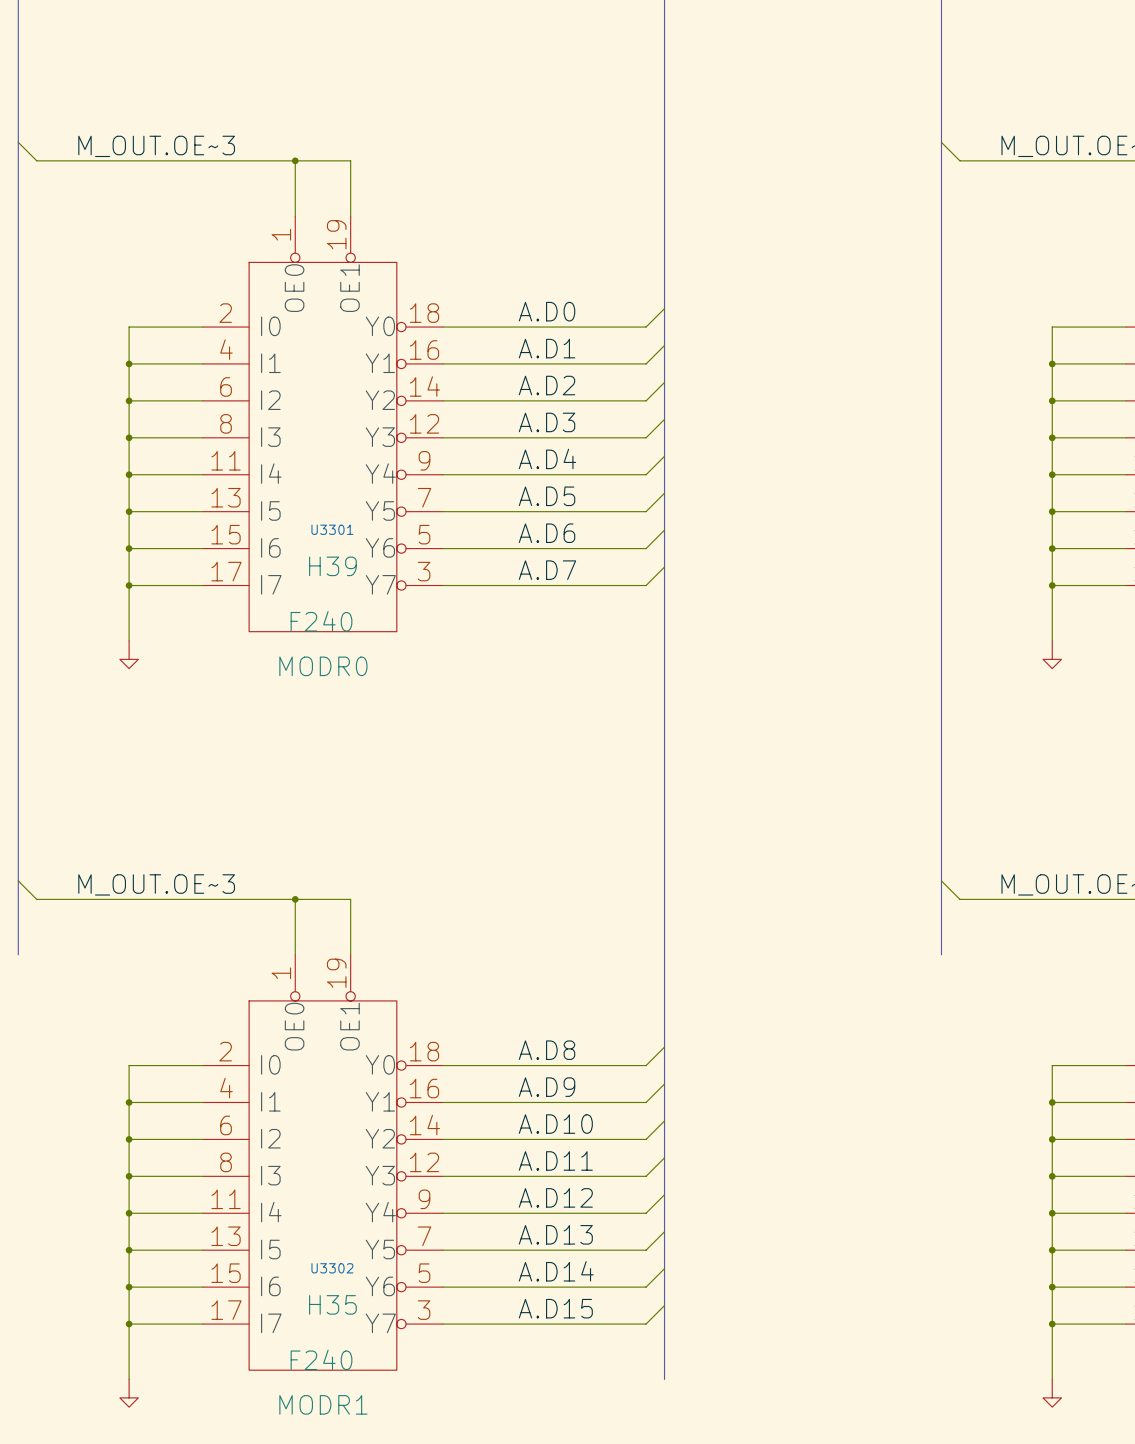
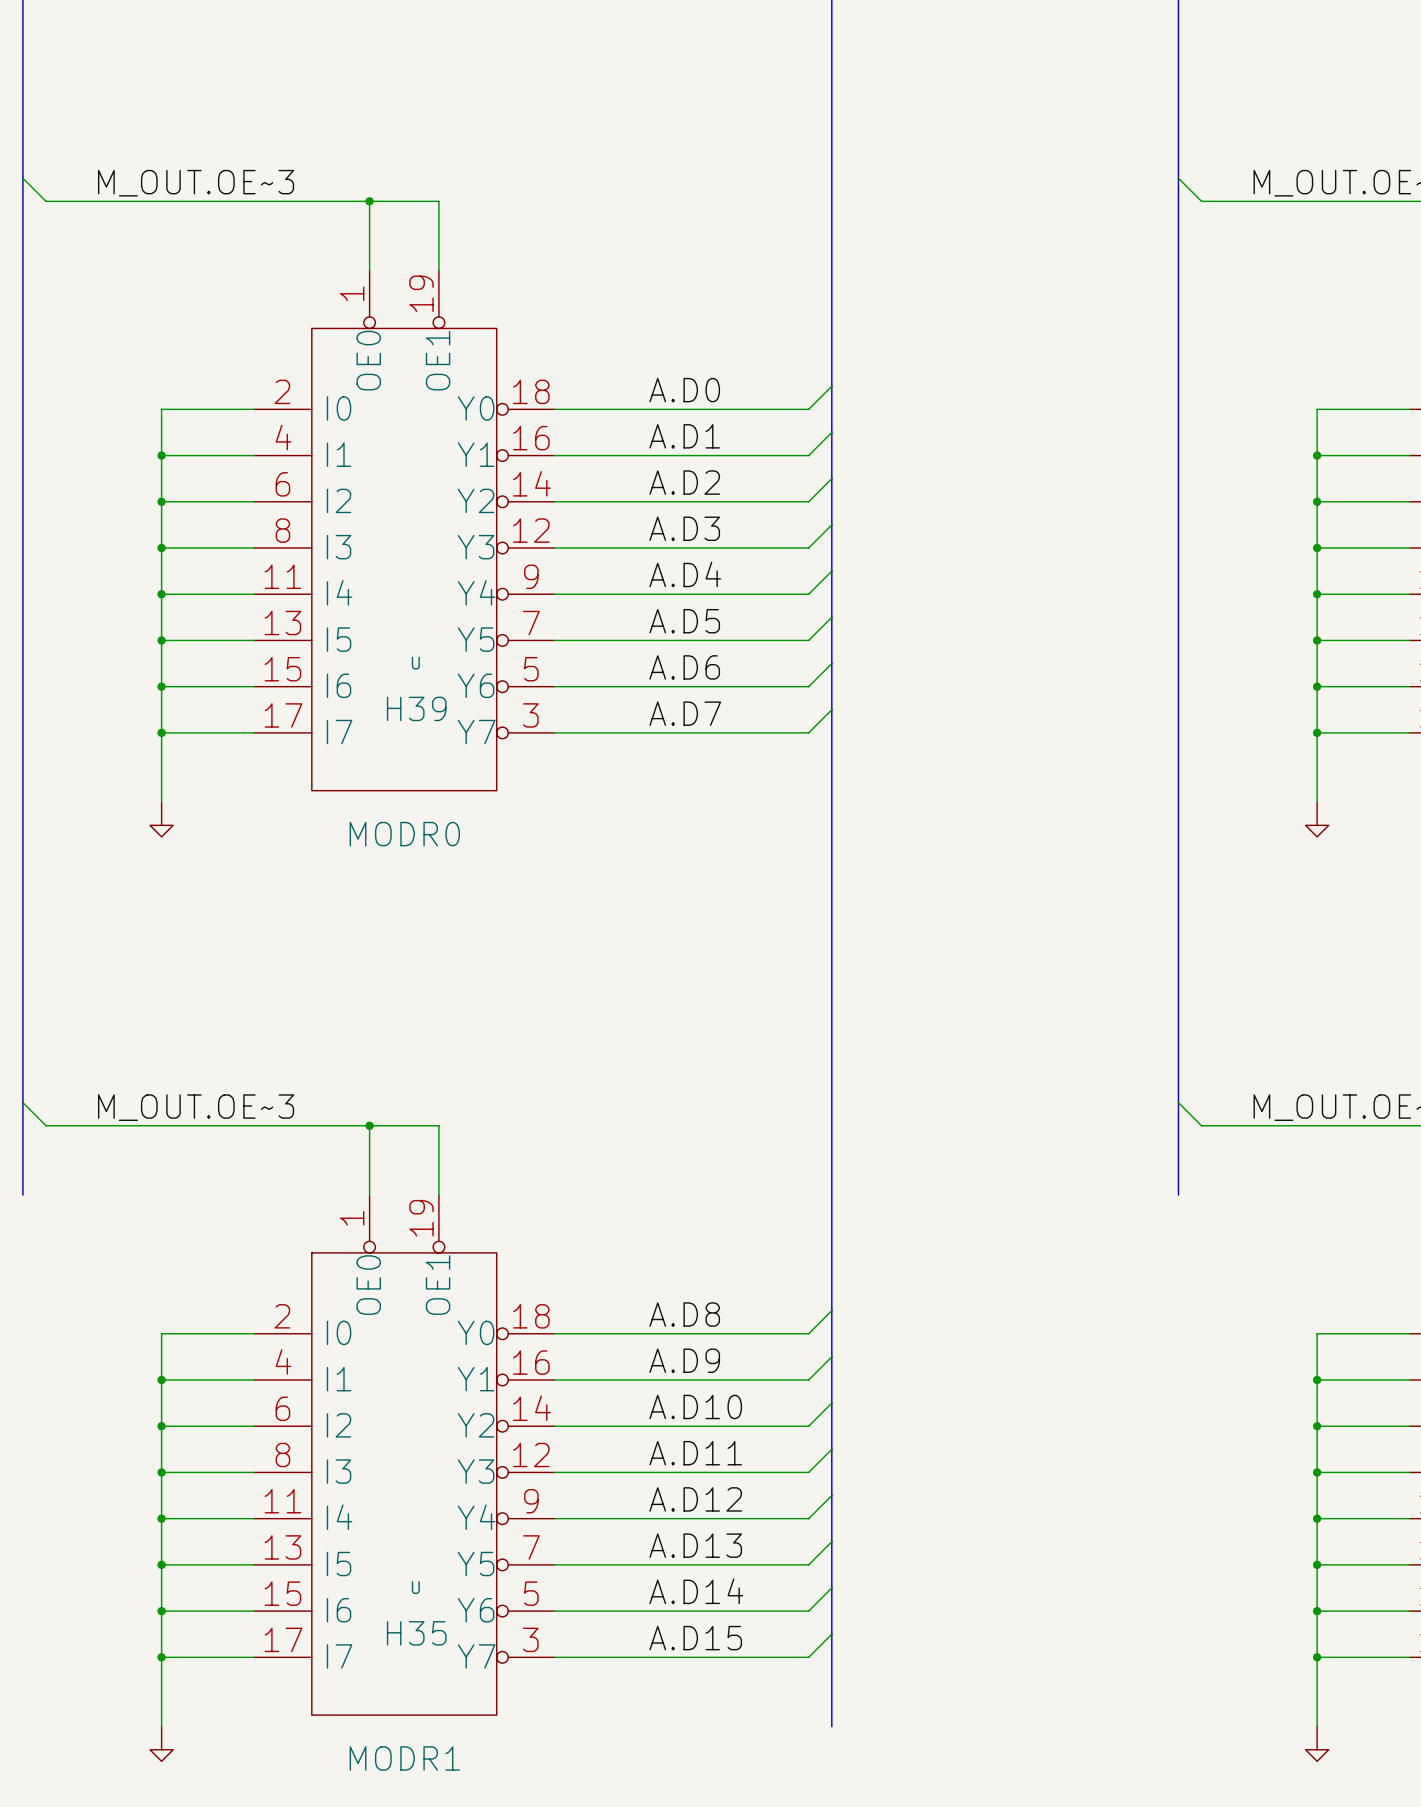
U3301 name: U3301 (332, 529) -> U (415, 663)
U3301 value: F240 (321, 621) -> none
U3302 name: U3302 (332, 1268) -> U (415, 1587)
U3302 value: F240 (321, 1359) -> none

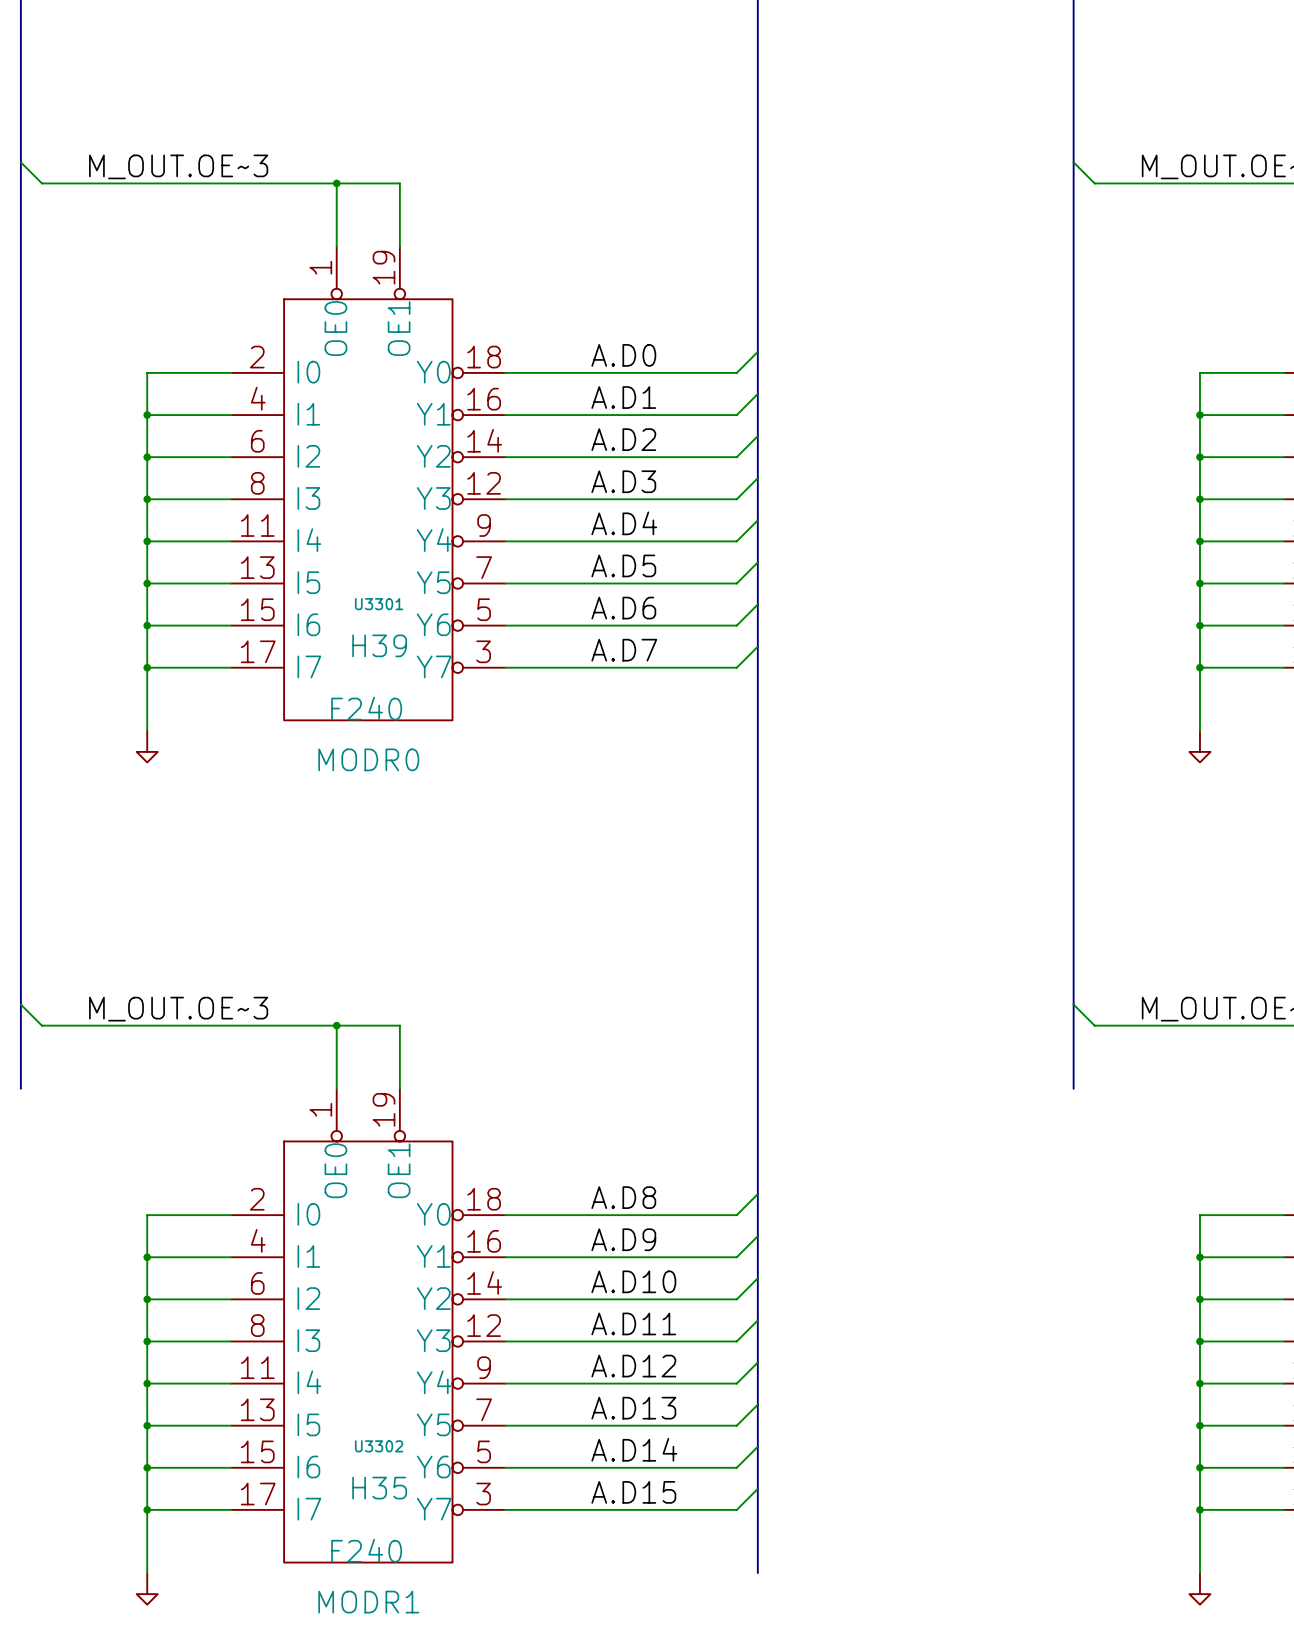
U name: U (415, 663) -> U3301 (379, 604)
U value: none -> F240 (366, 708)
U name: U (415, 1587) -> U3302 (379, 1446)
U value: none -> F240 (366, 1550)

